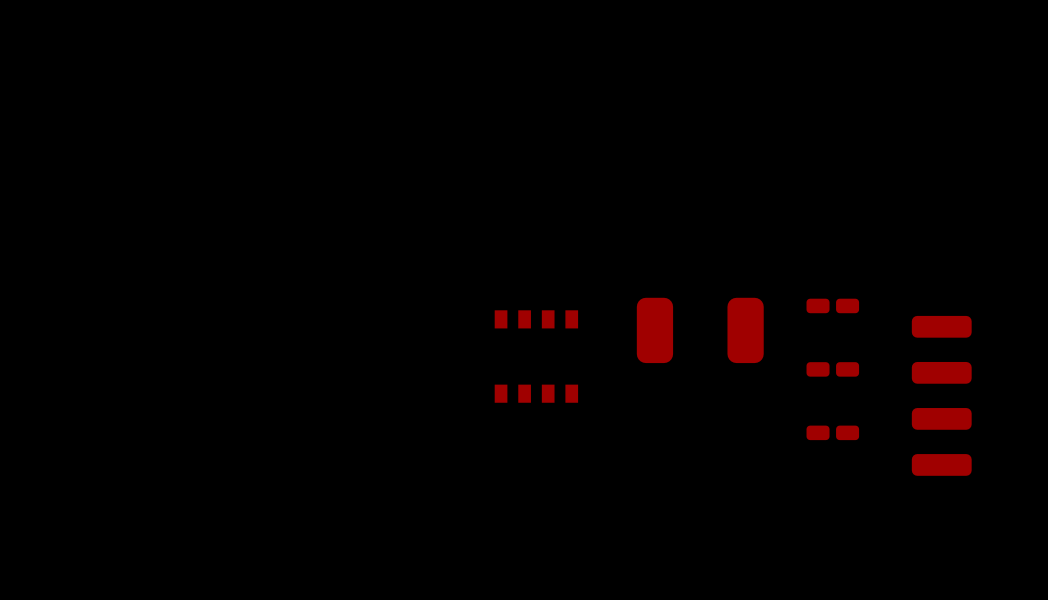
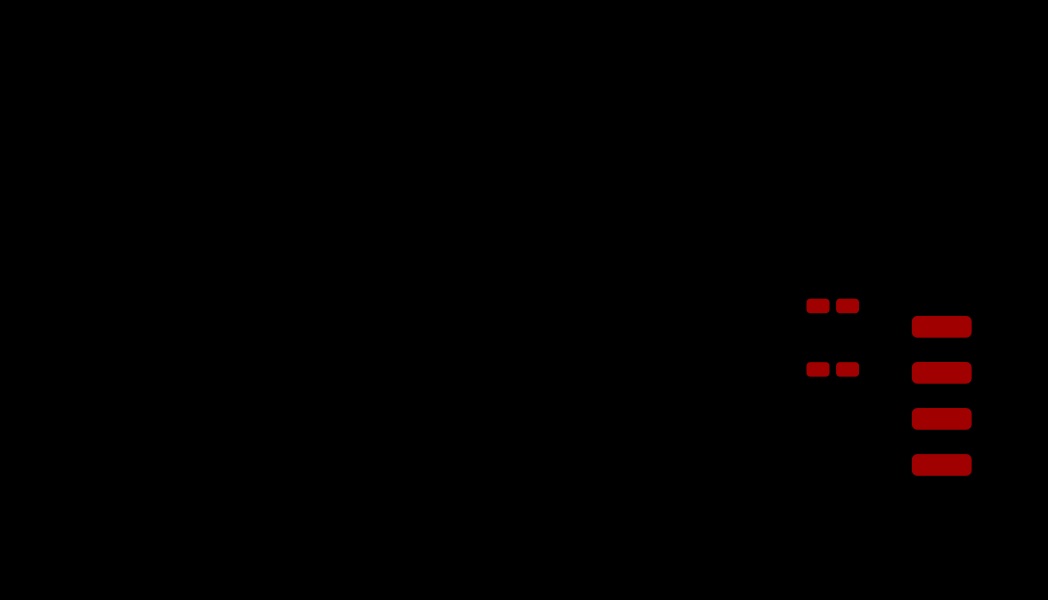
part: (700, 330) -> none
part: (536, 356) -> none
part: (832, 432) -> none

